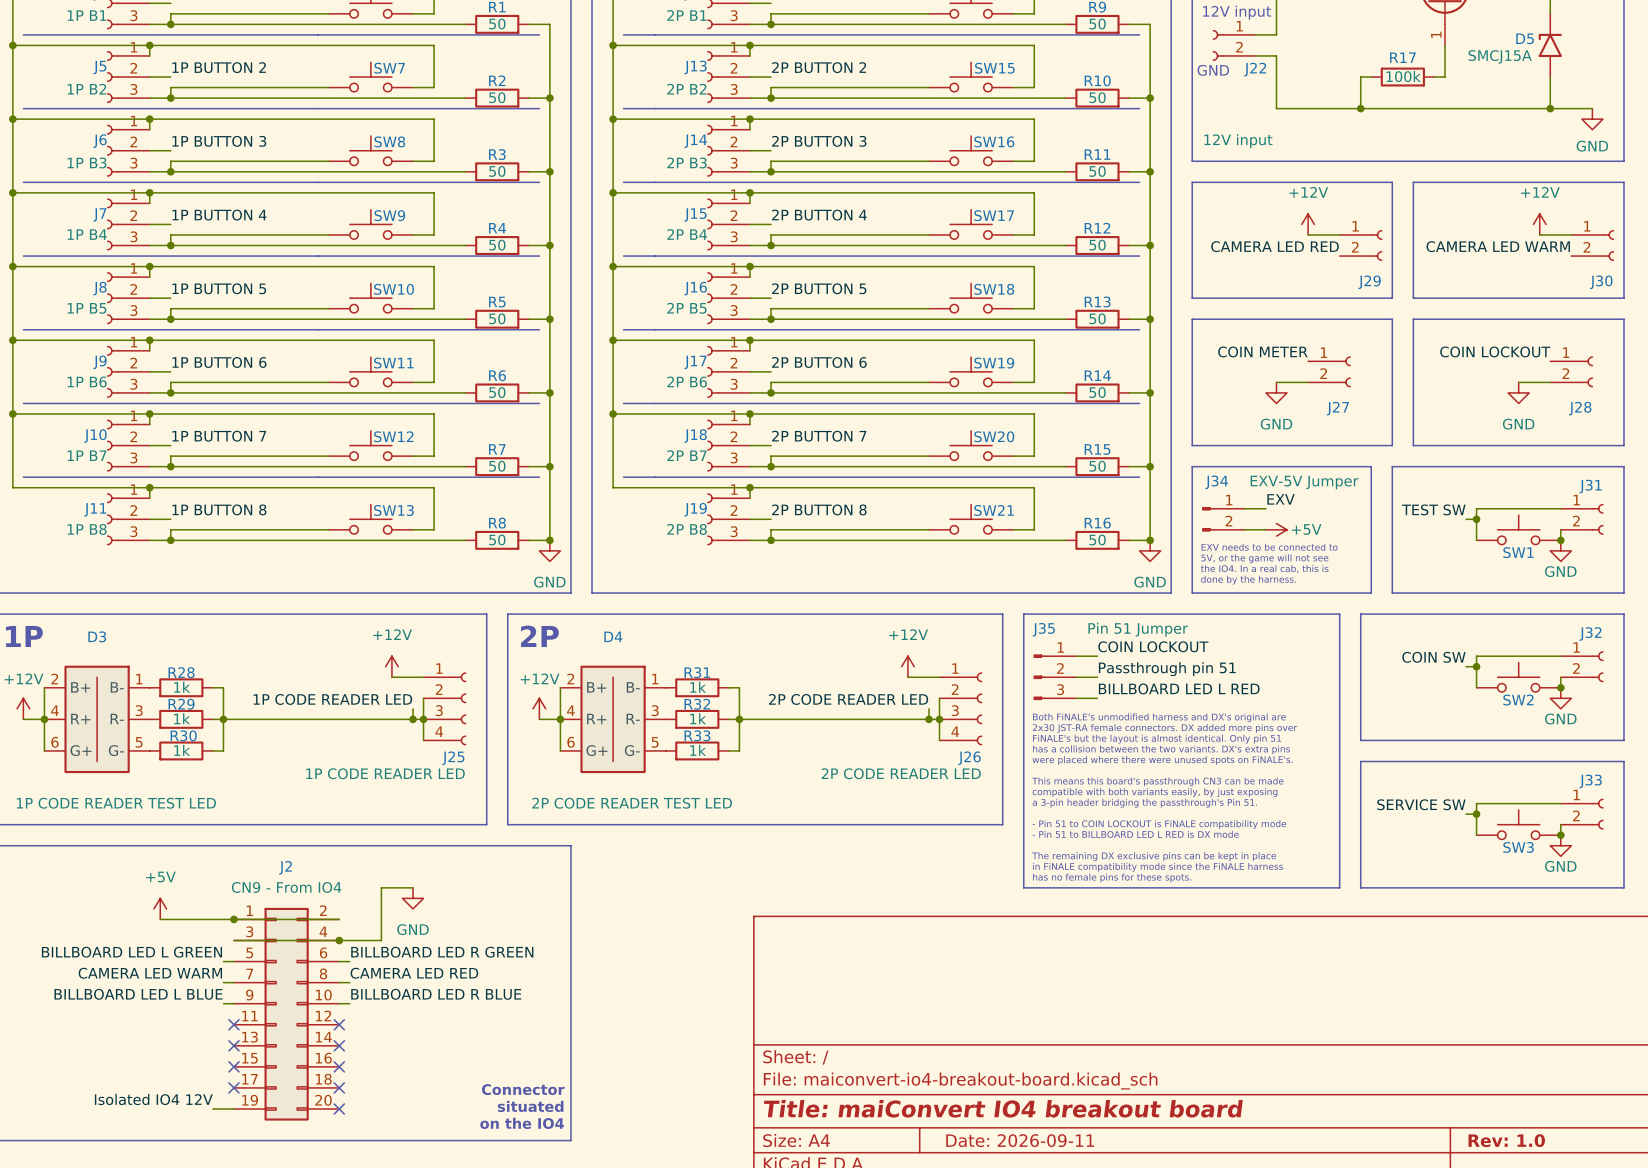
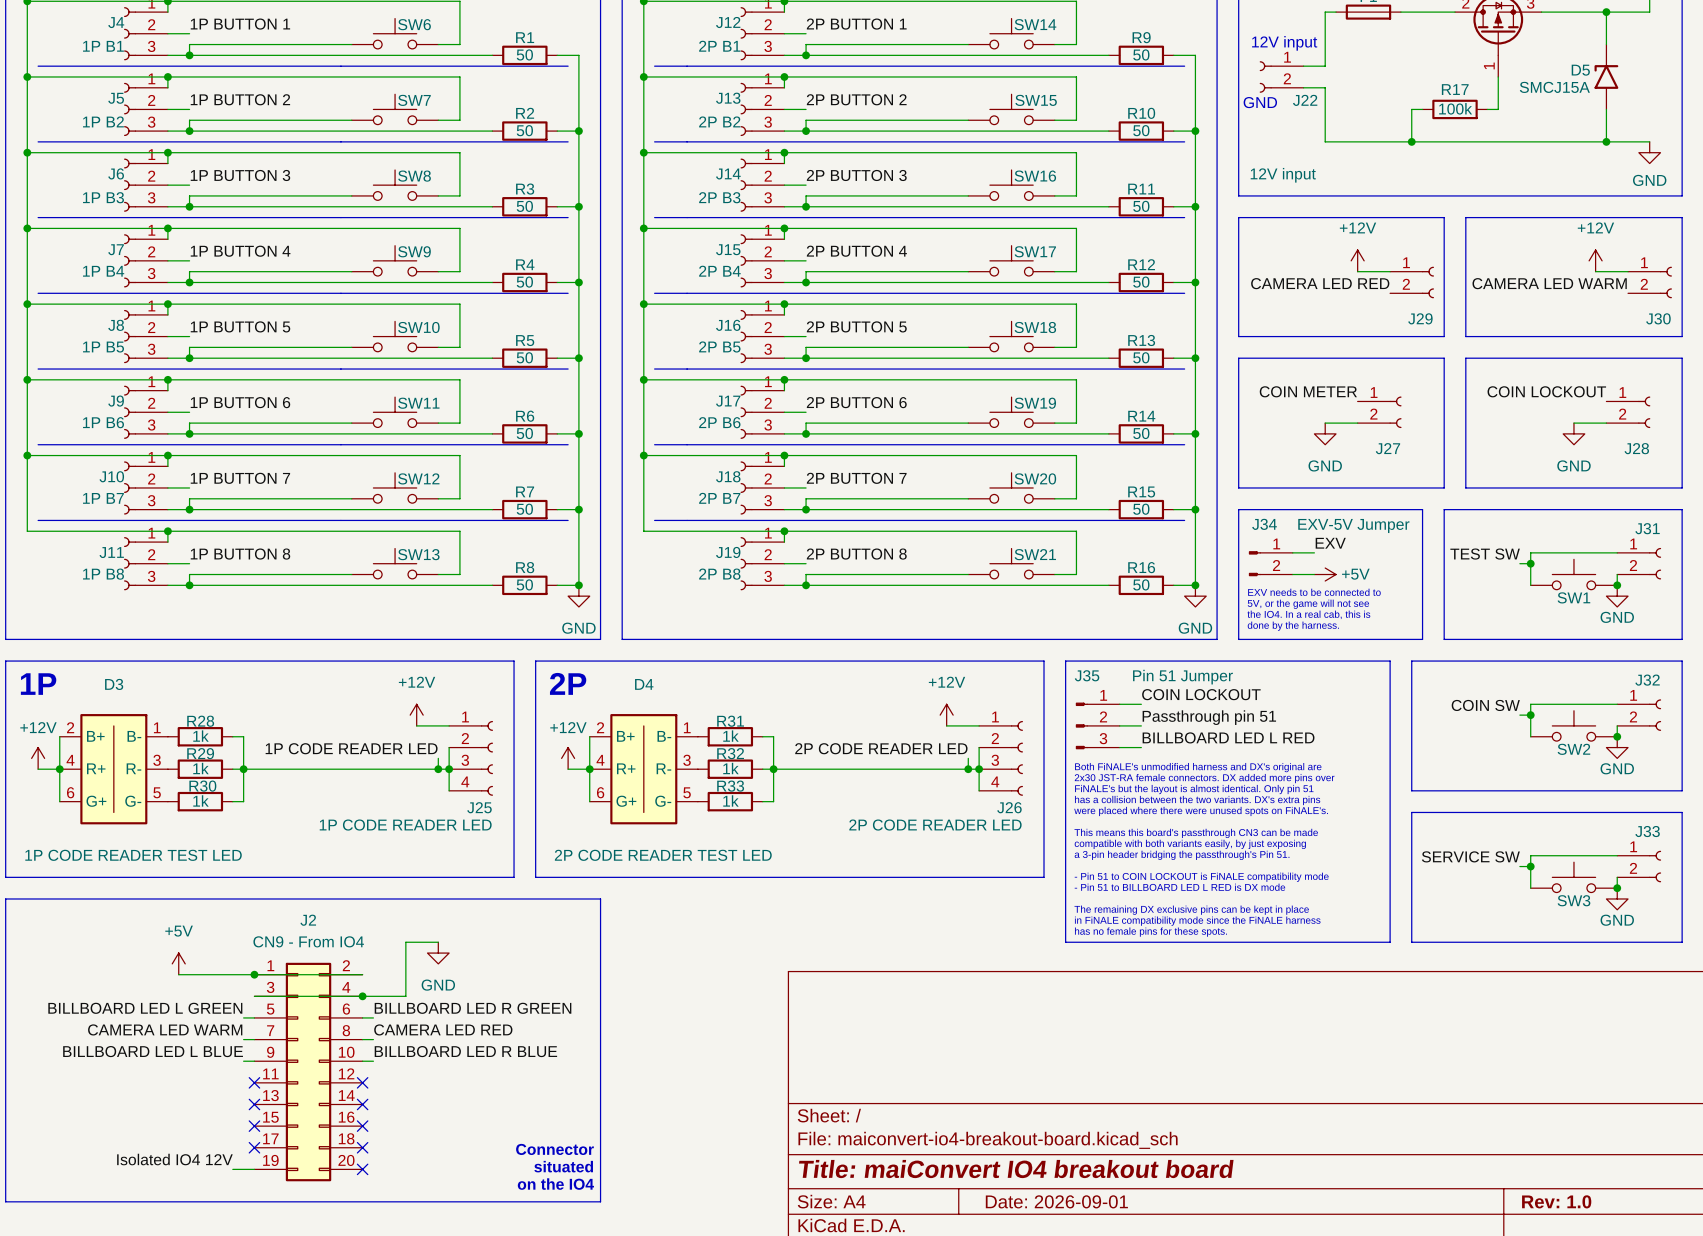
title block: Date: 2026-09-11 (1020, 1140) -> Date: 2026-09-01 (1056, 1201)

